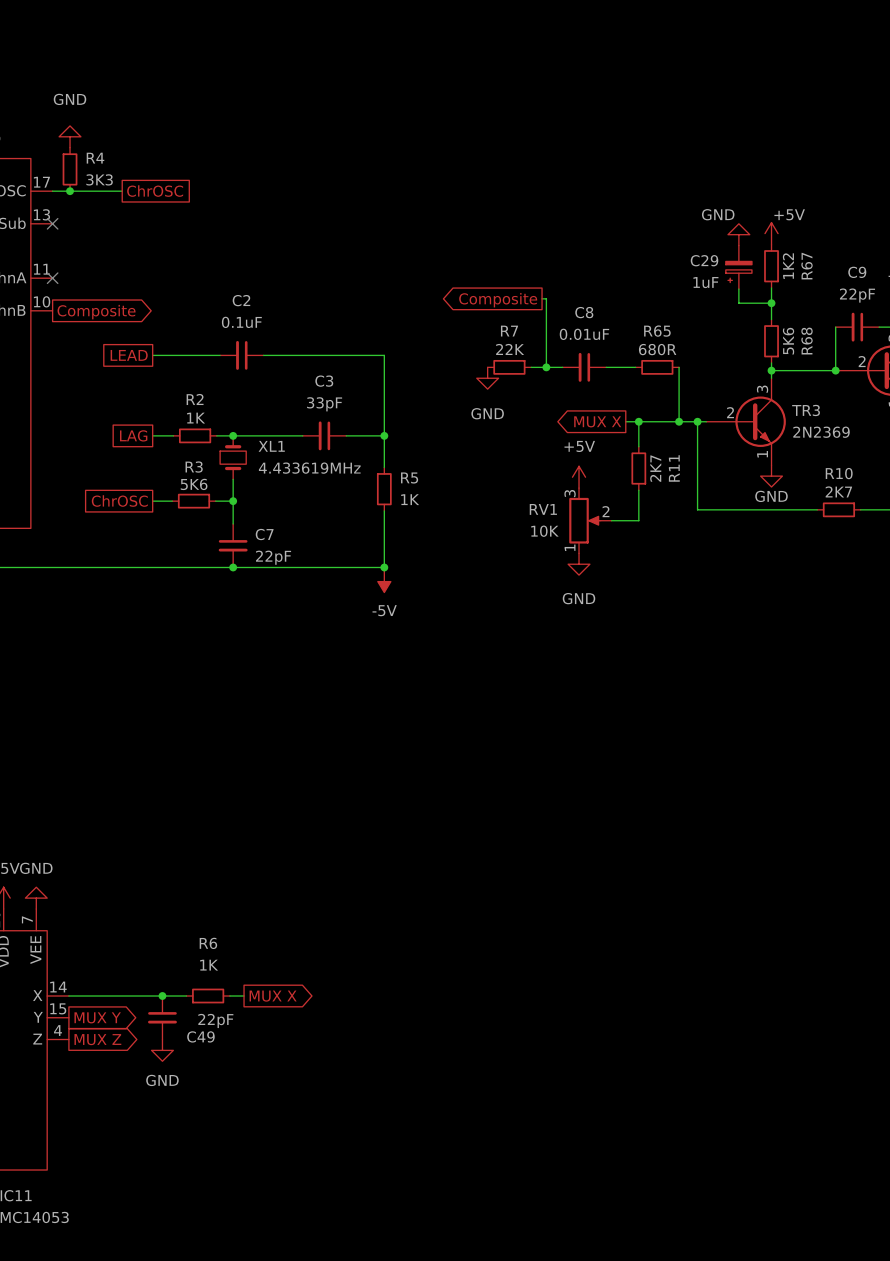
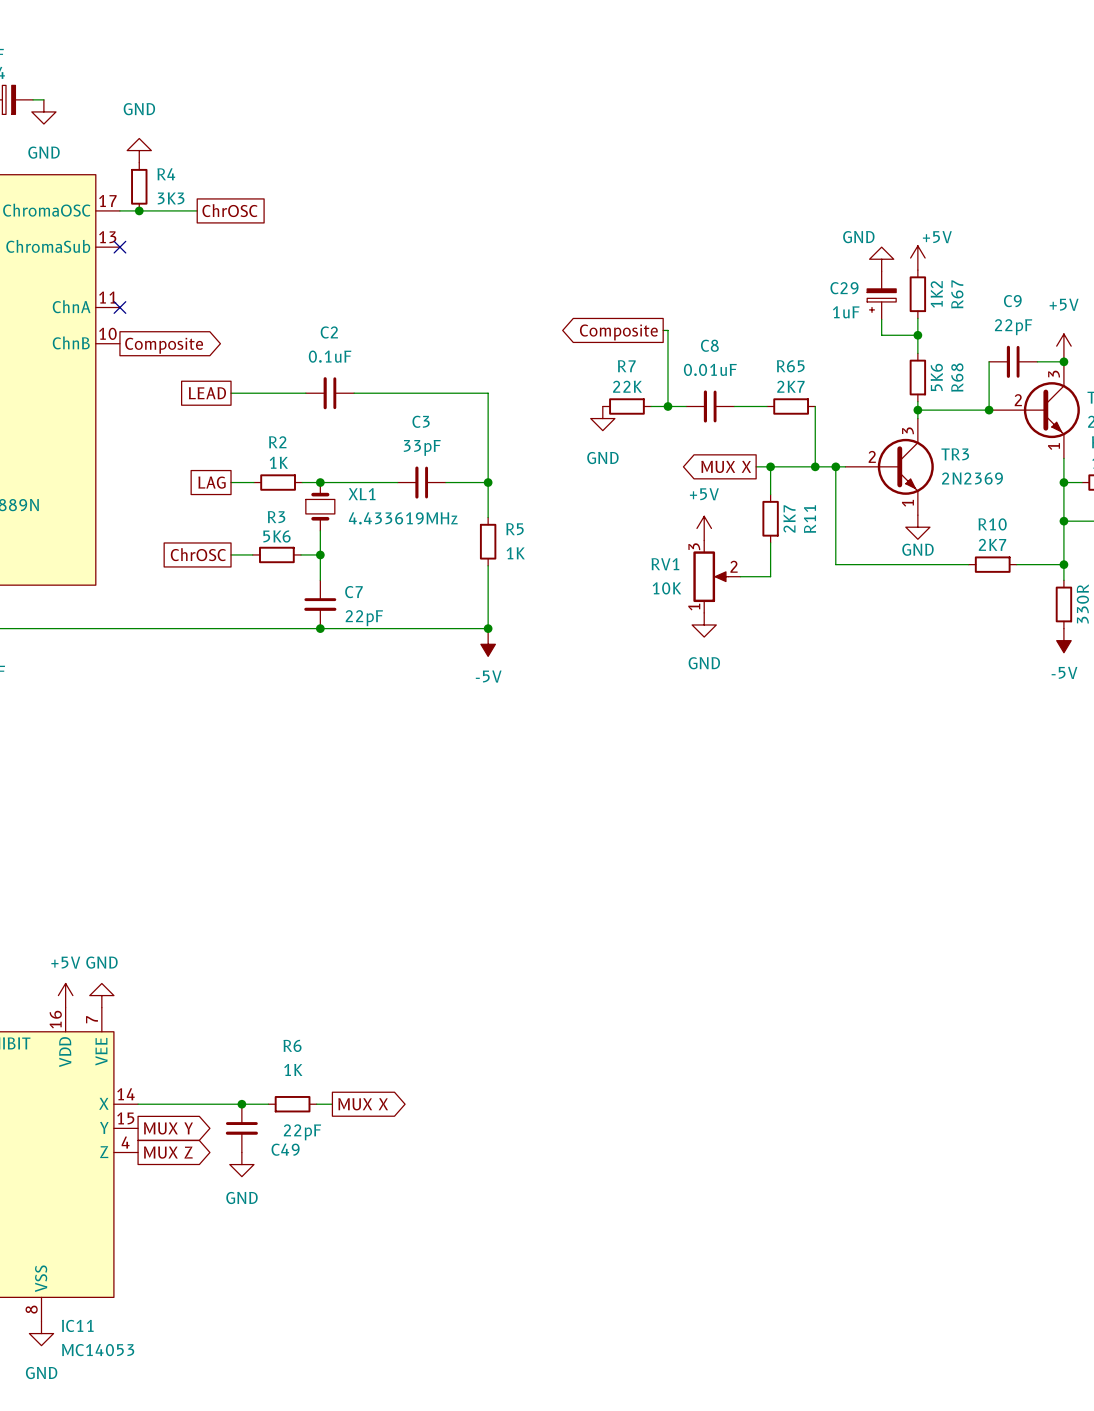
R65 value: 680R (657, 349) -> 2K7 (790, 386)

